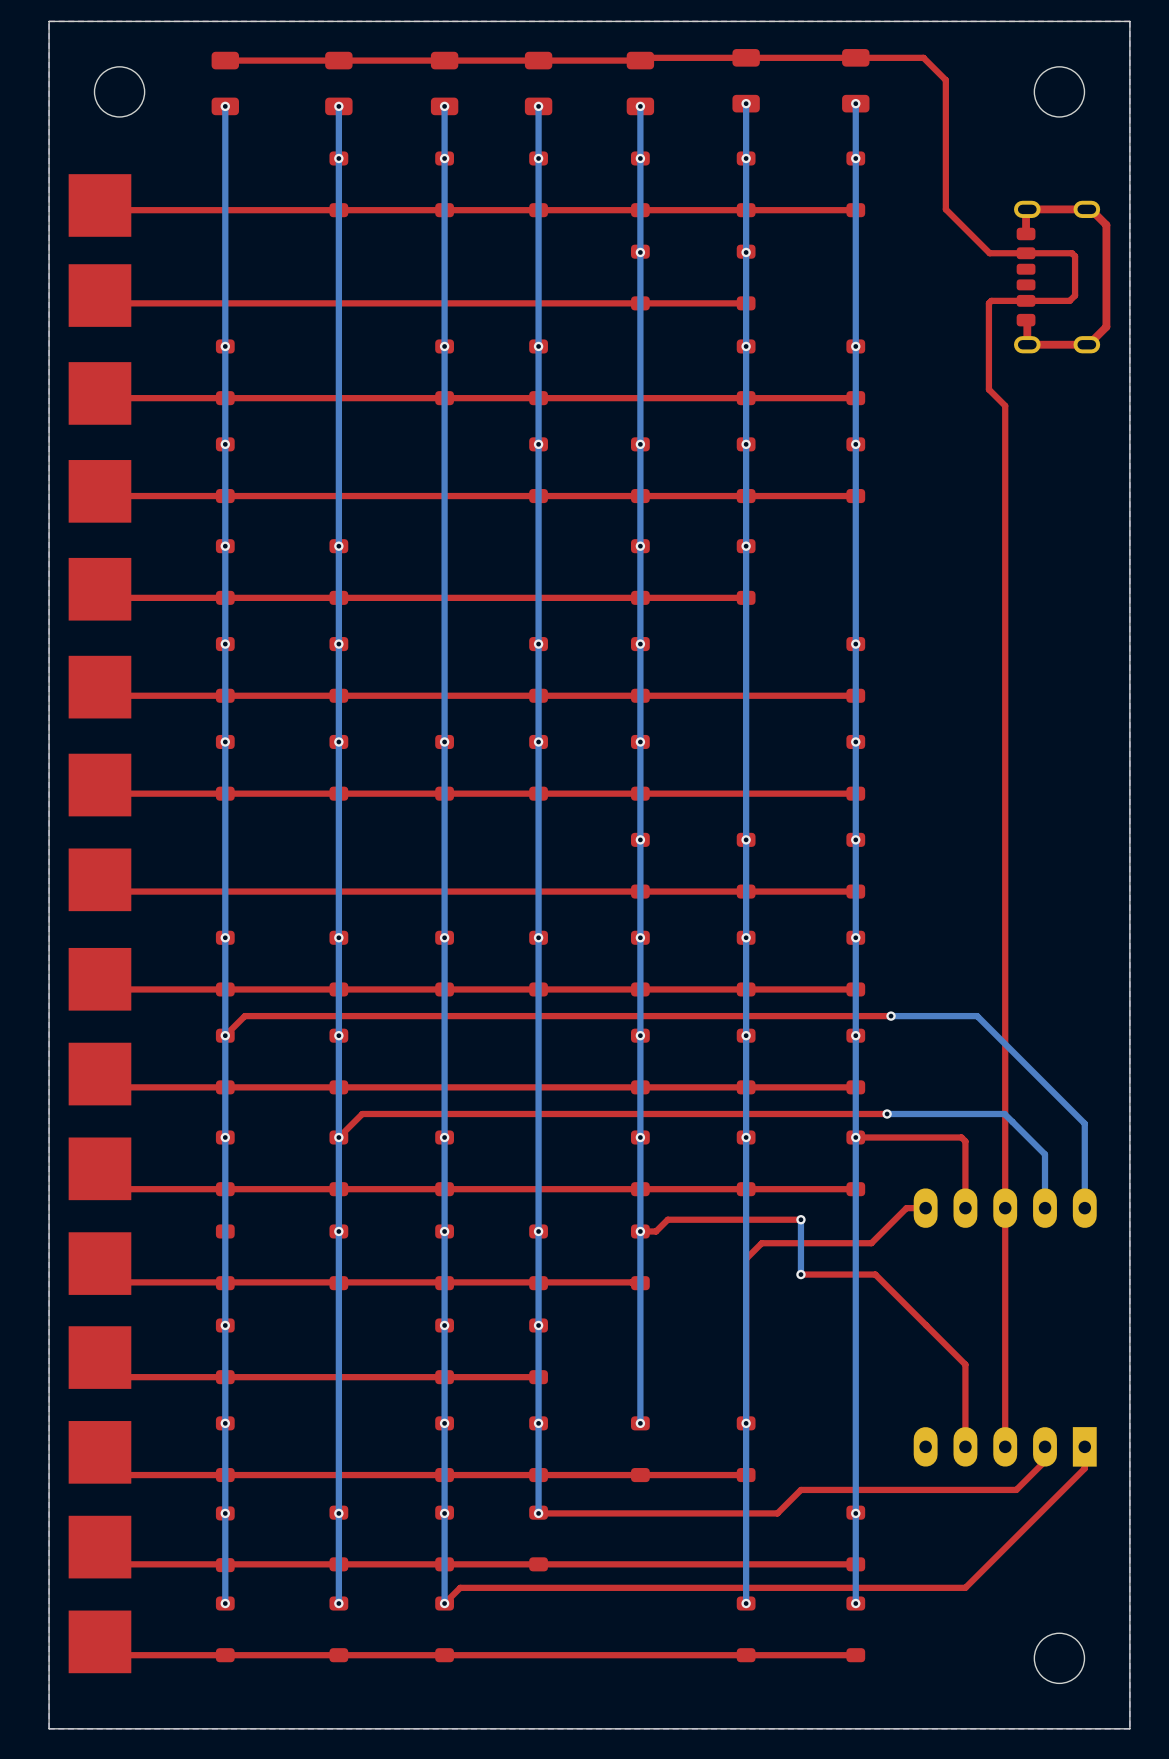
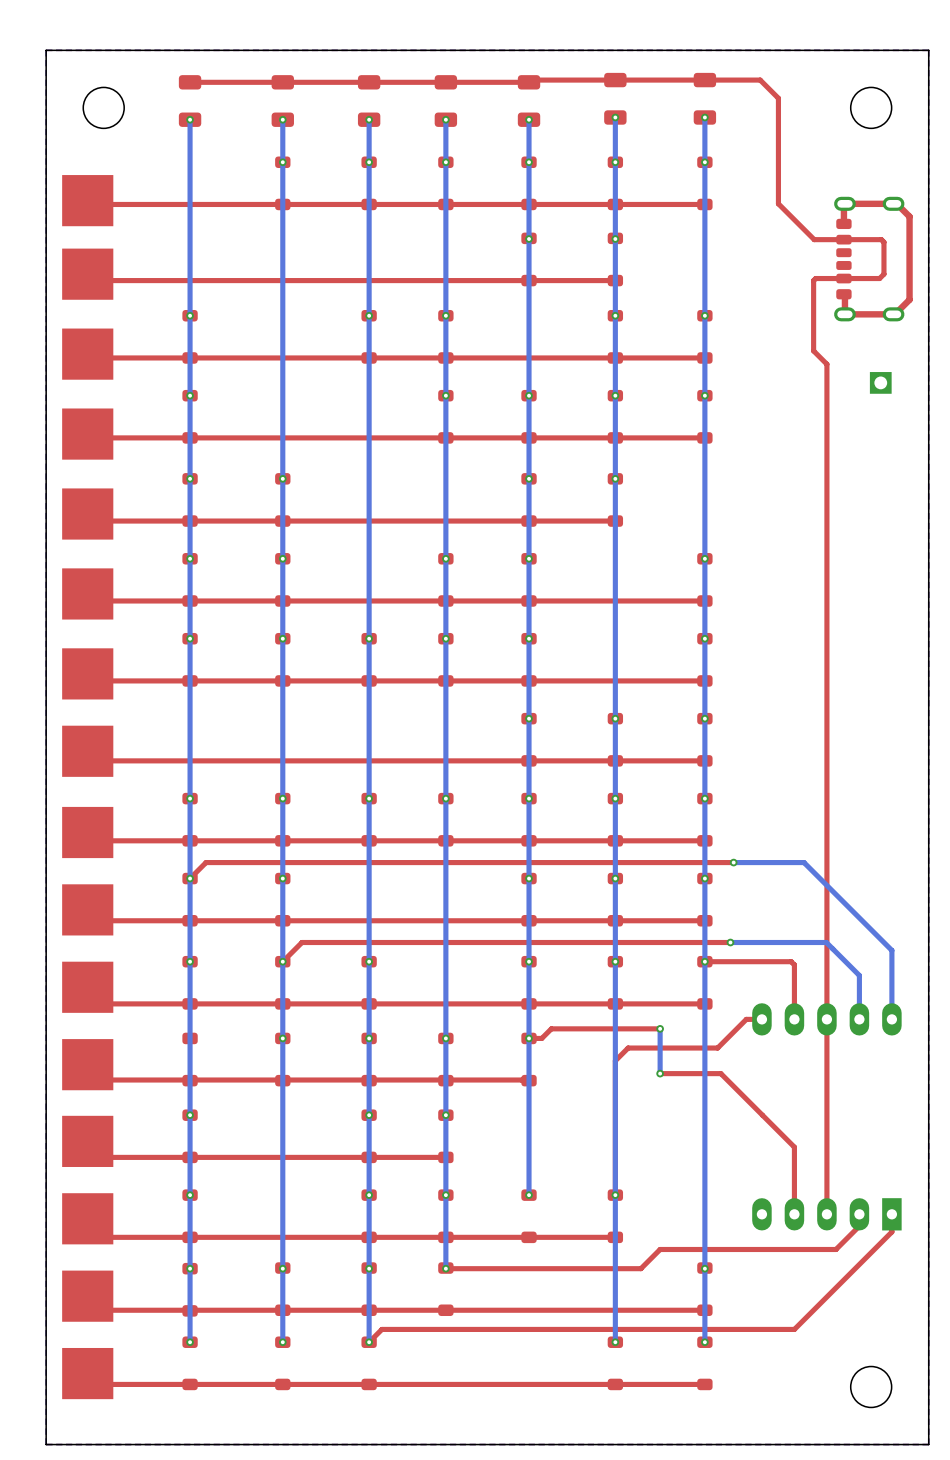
part: none -> (880, 382)

